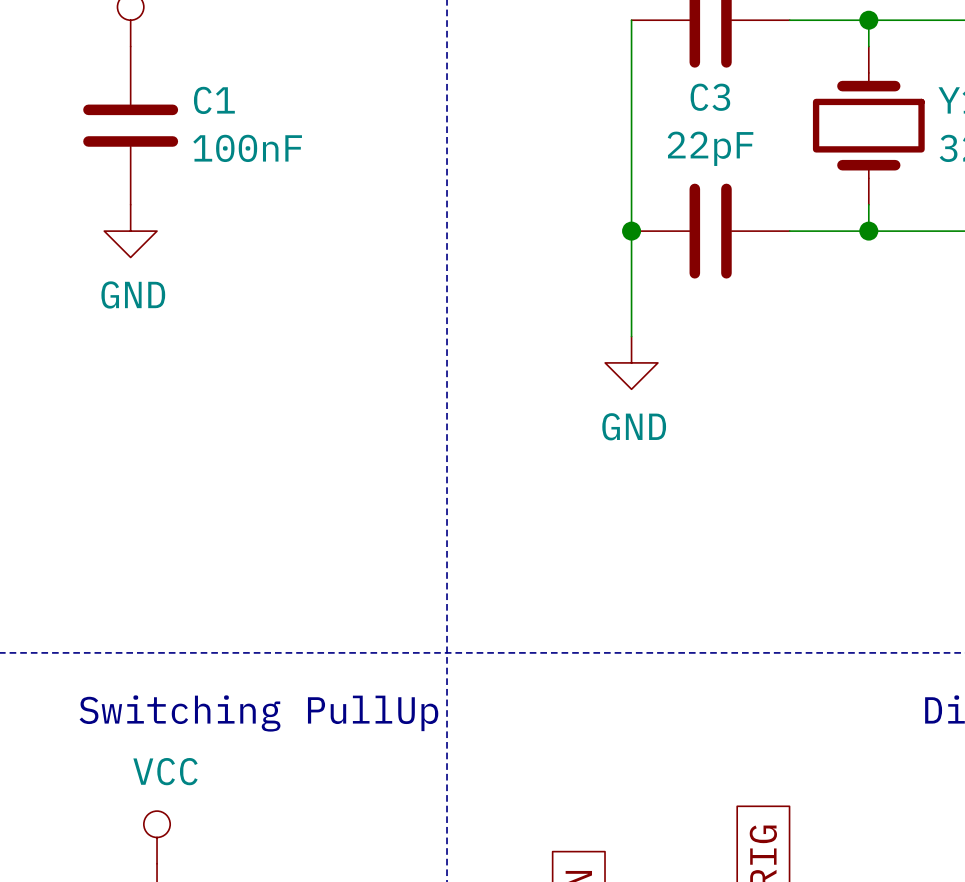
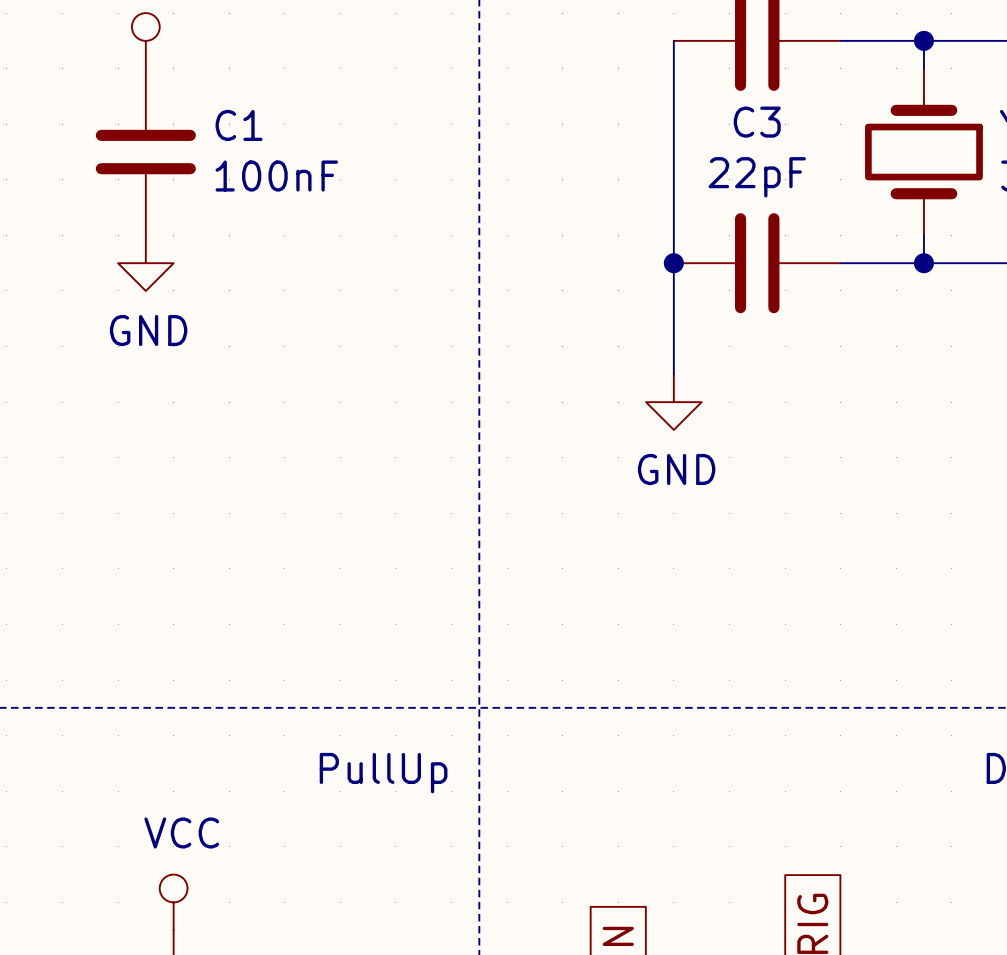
text: Switching PullUp (258, 713) -> none
text: none -> PullUp (383, 773)

